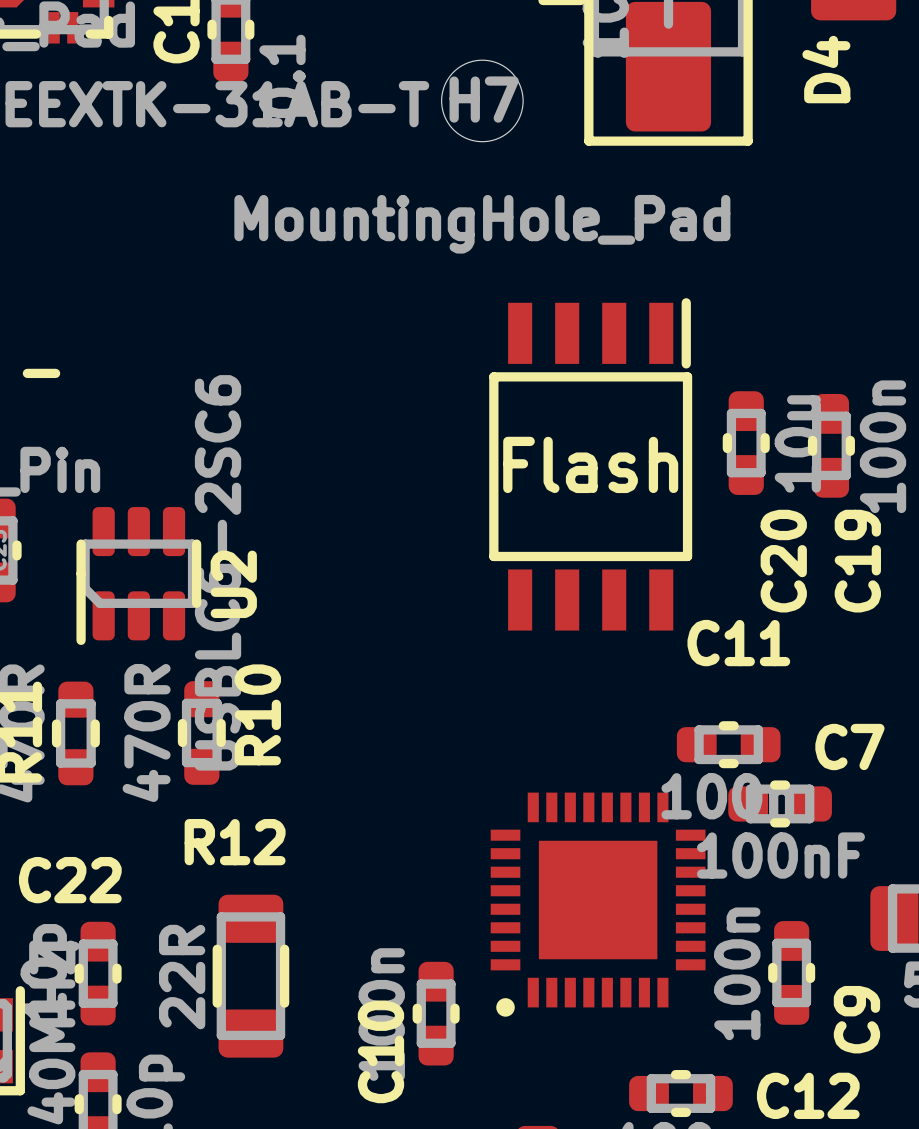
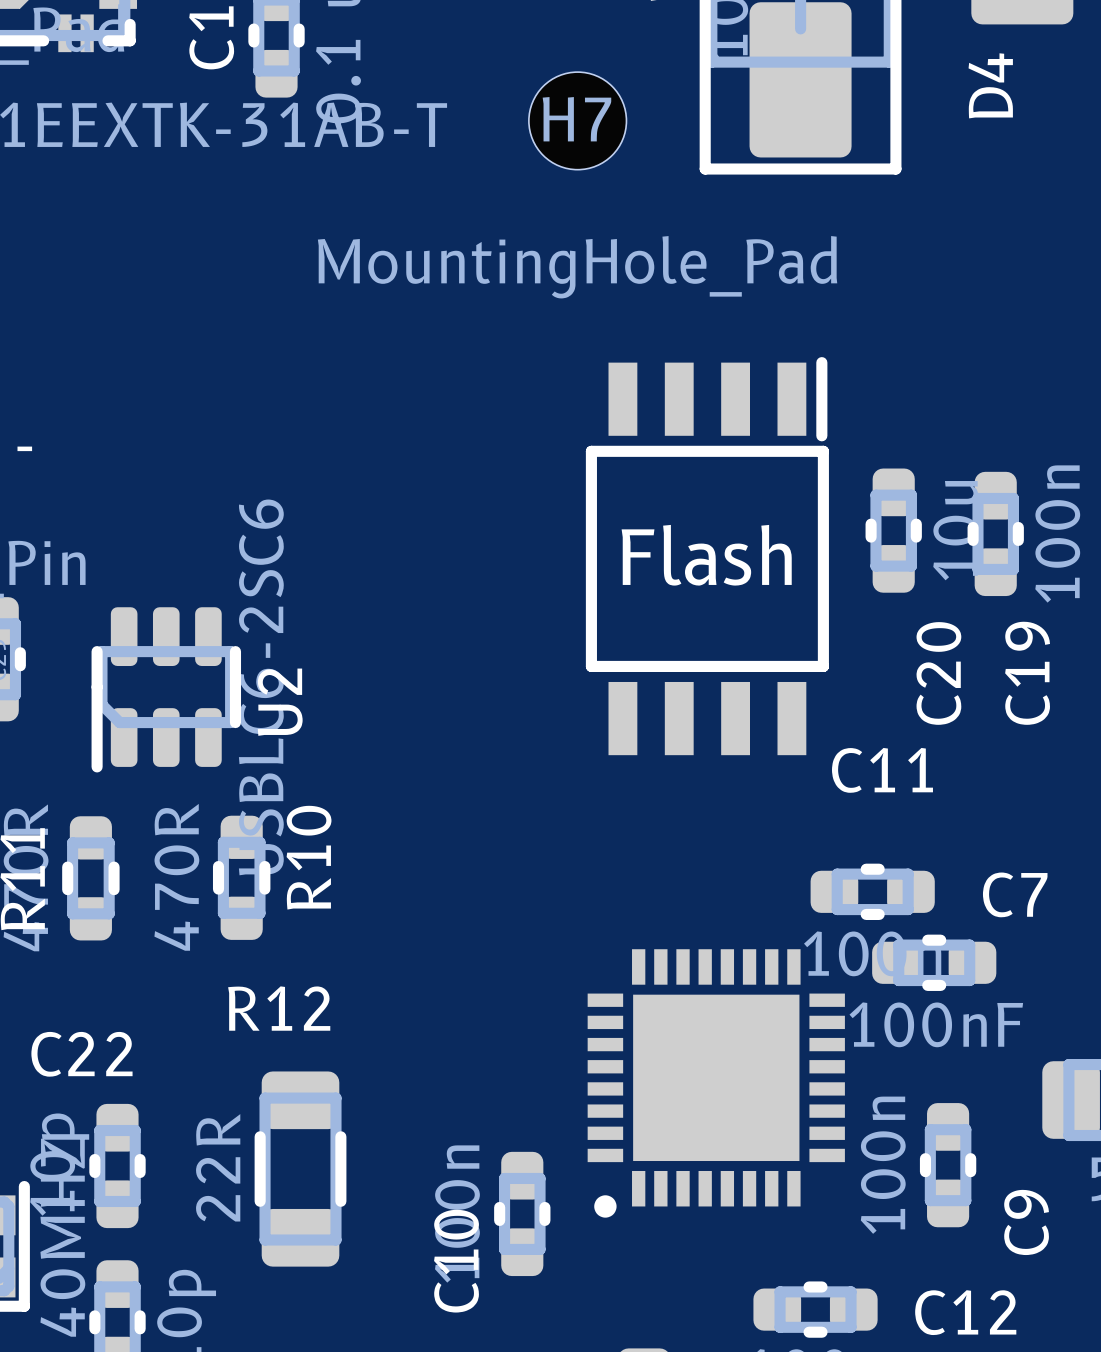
part footprint: [490, 792, 706, 1017] -> [587, 949, 845, 1218]

